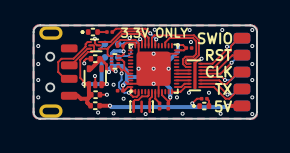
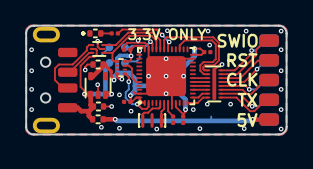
top track: (201, 98) (196, 98) (192, 103) -> none
part: (204, 98) -> none
top track: (206, 98) (208, 106) -> none
via: (192, 103) -> none
part: (201, 106) -> none

